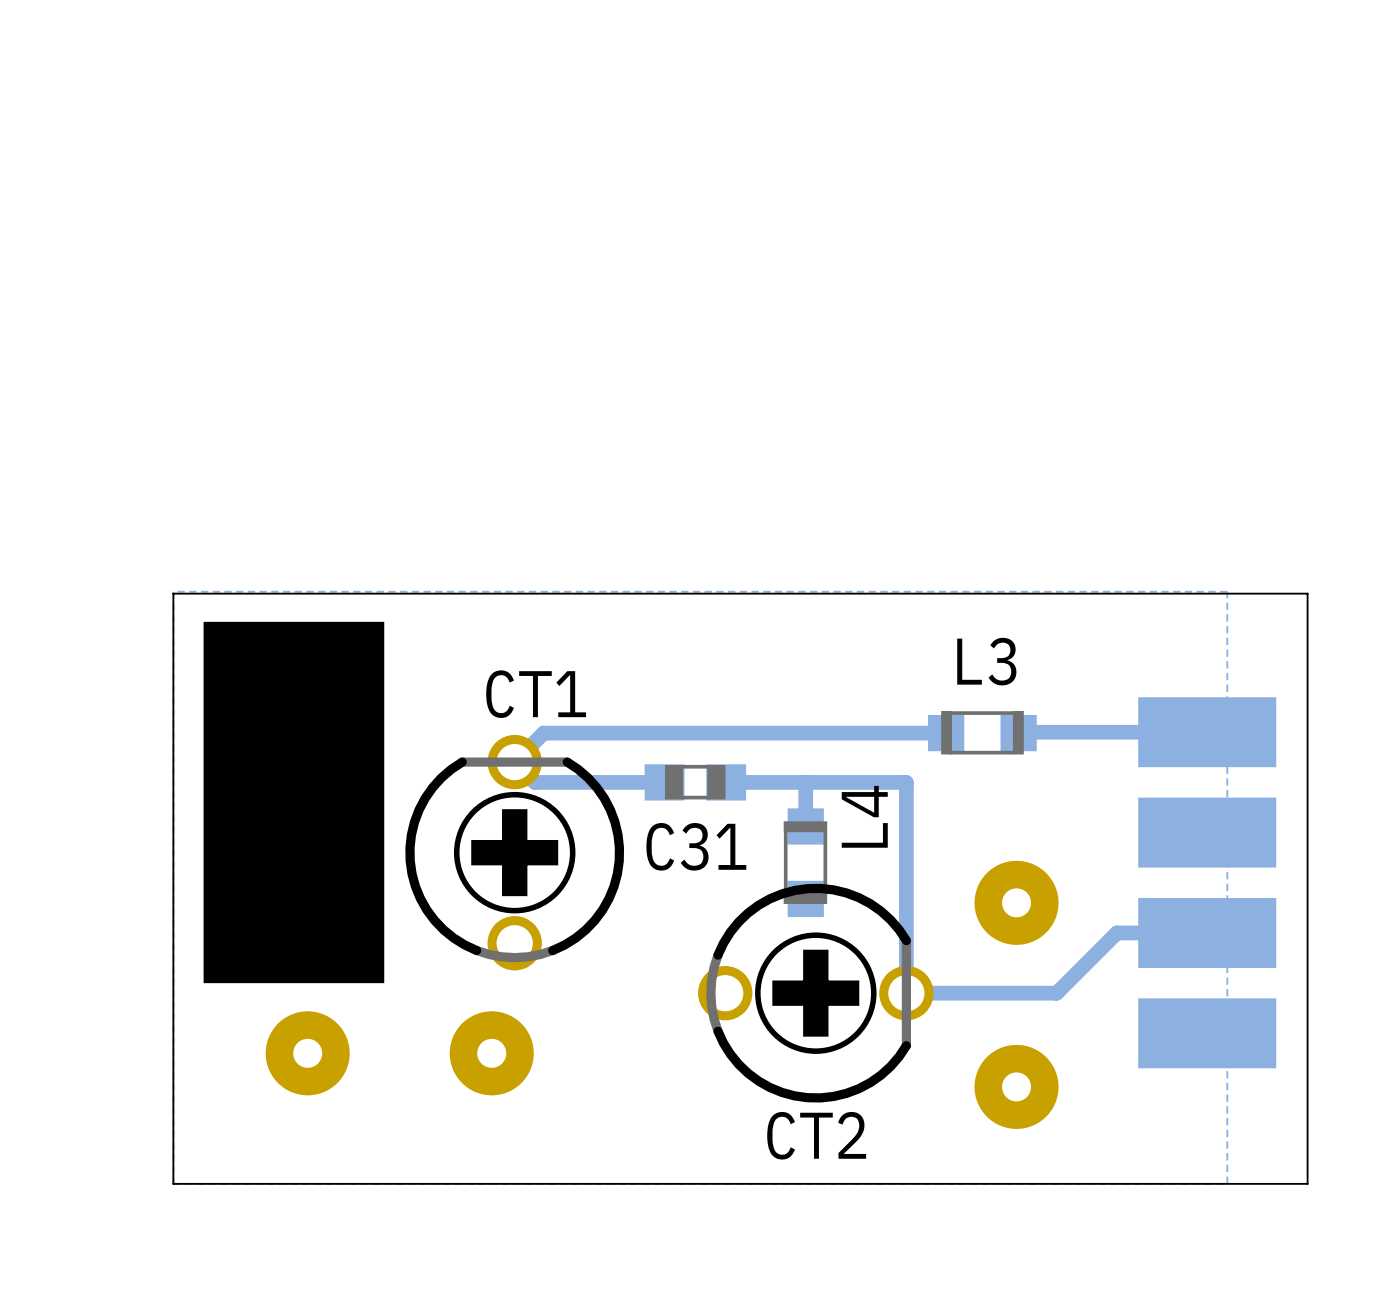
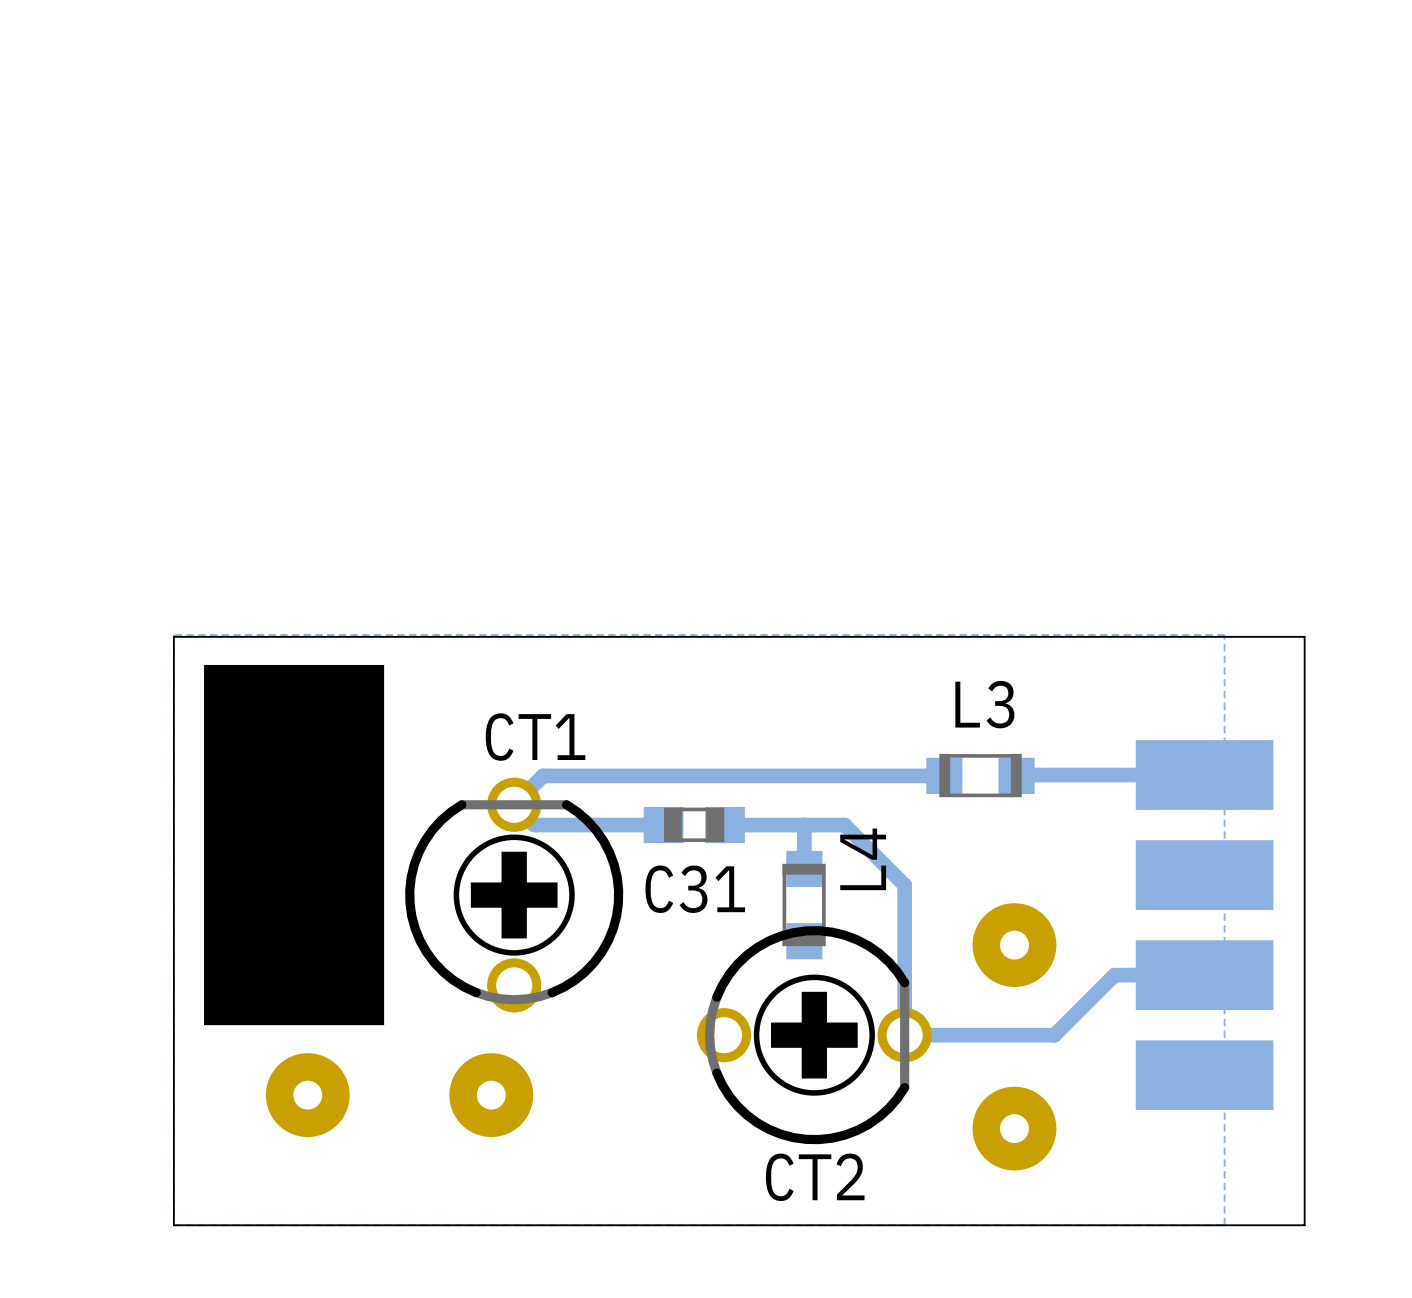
track: (906, 782) (906, 842) -> (844, 825) (904, 885)
track: (906, 782) (846, 782) -> none

